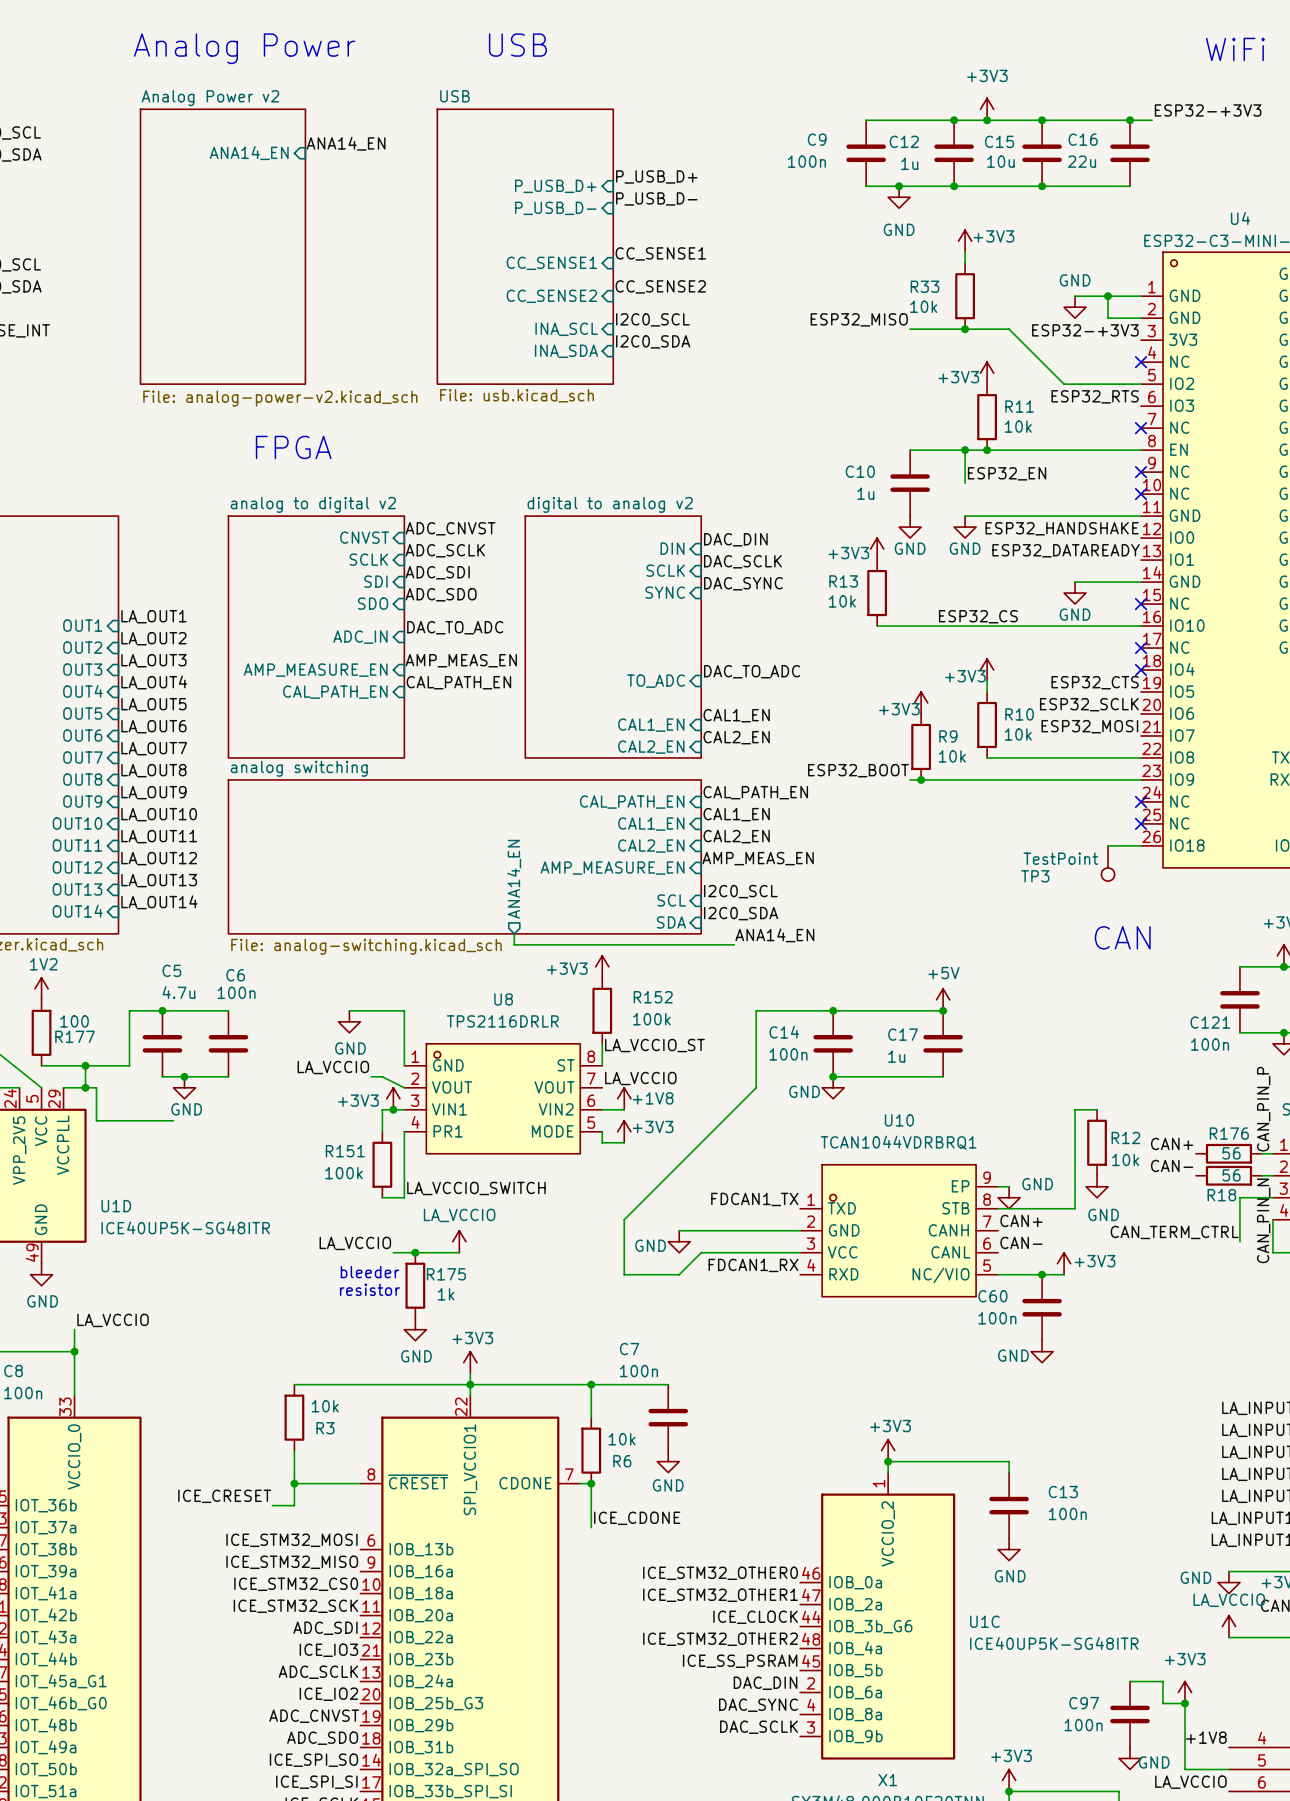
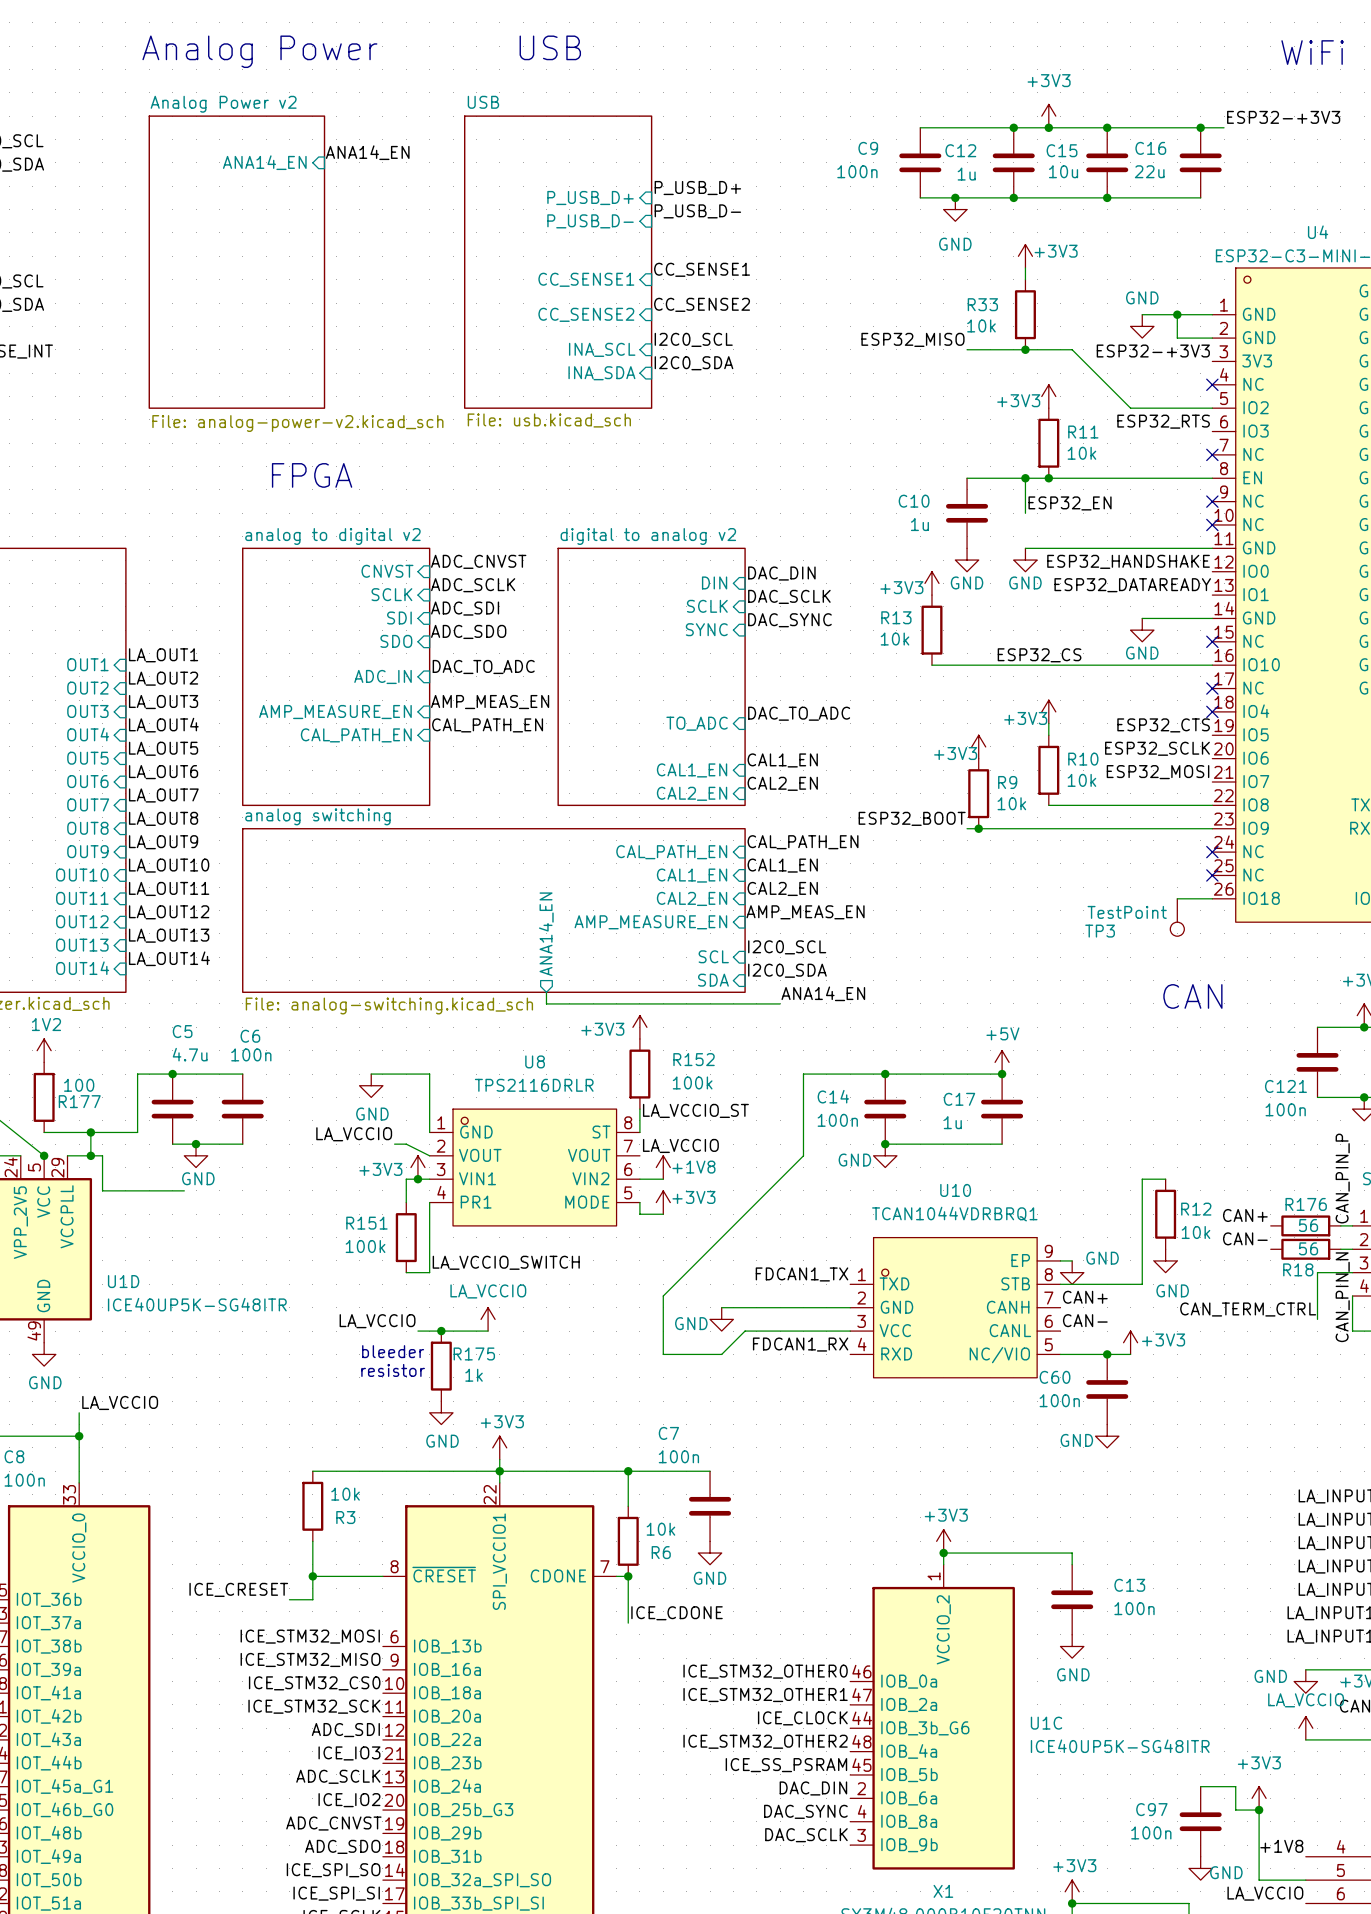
junction: none -> (44, 1155)

